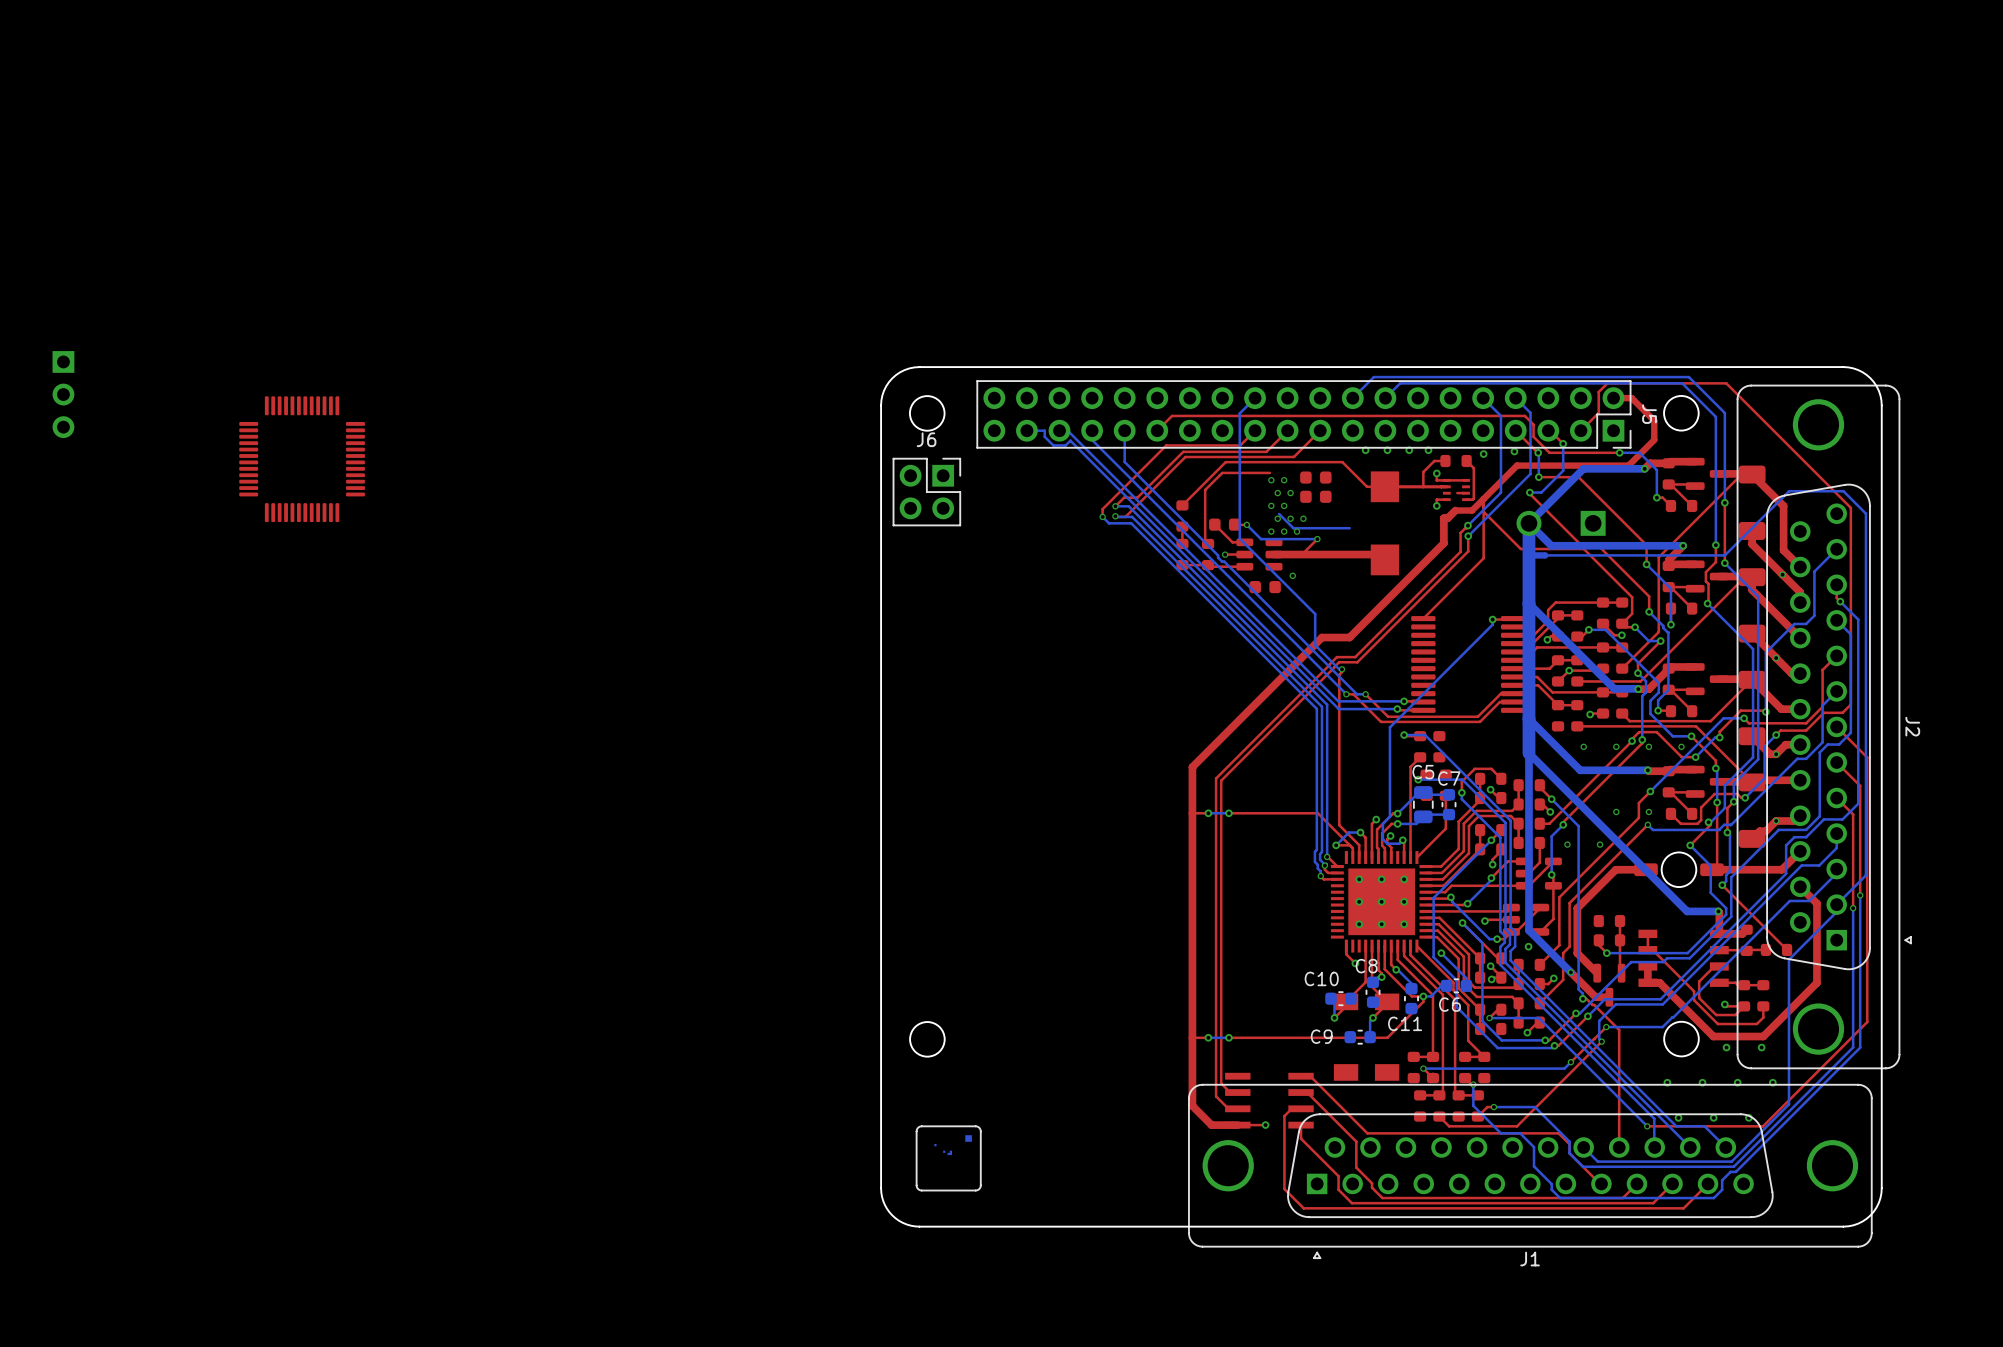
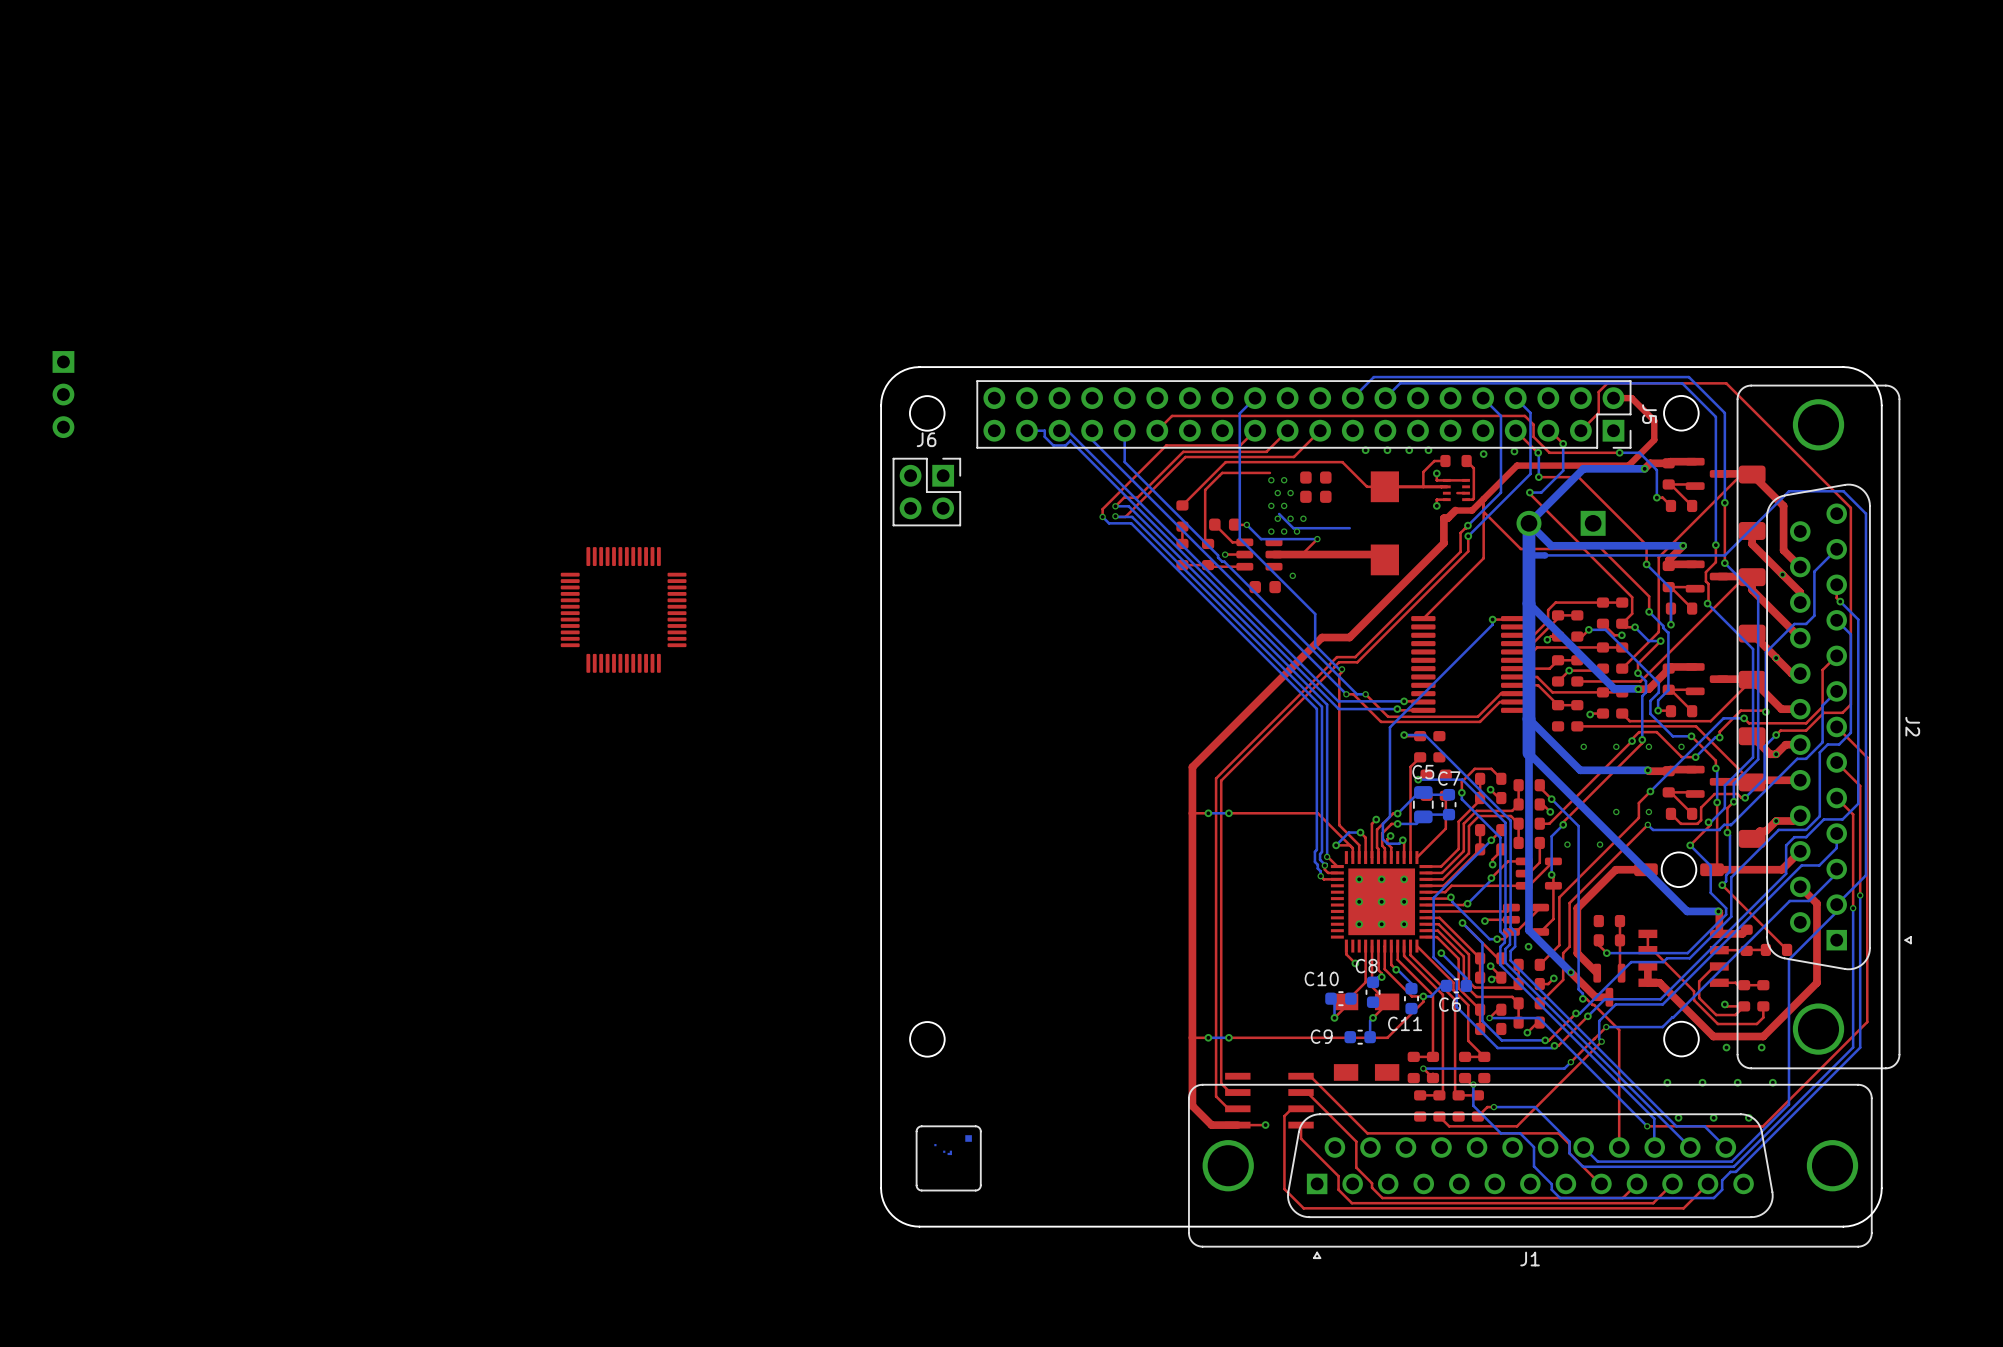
part: (302, 459) -> none
part: none -> (623, 609)

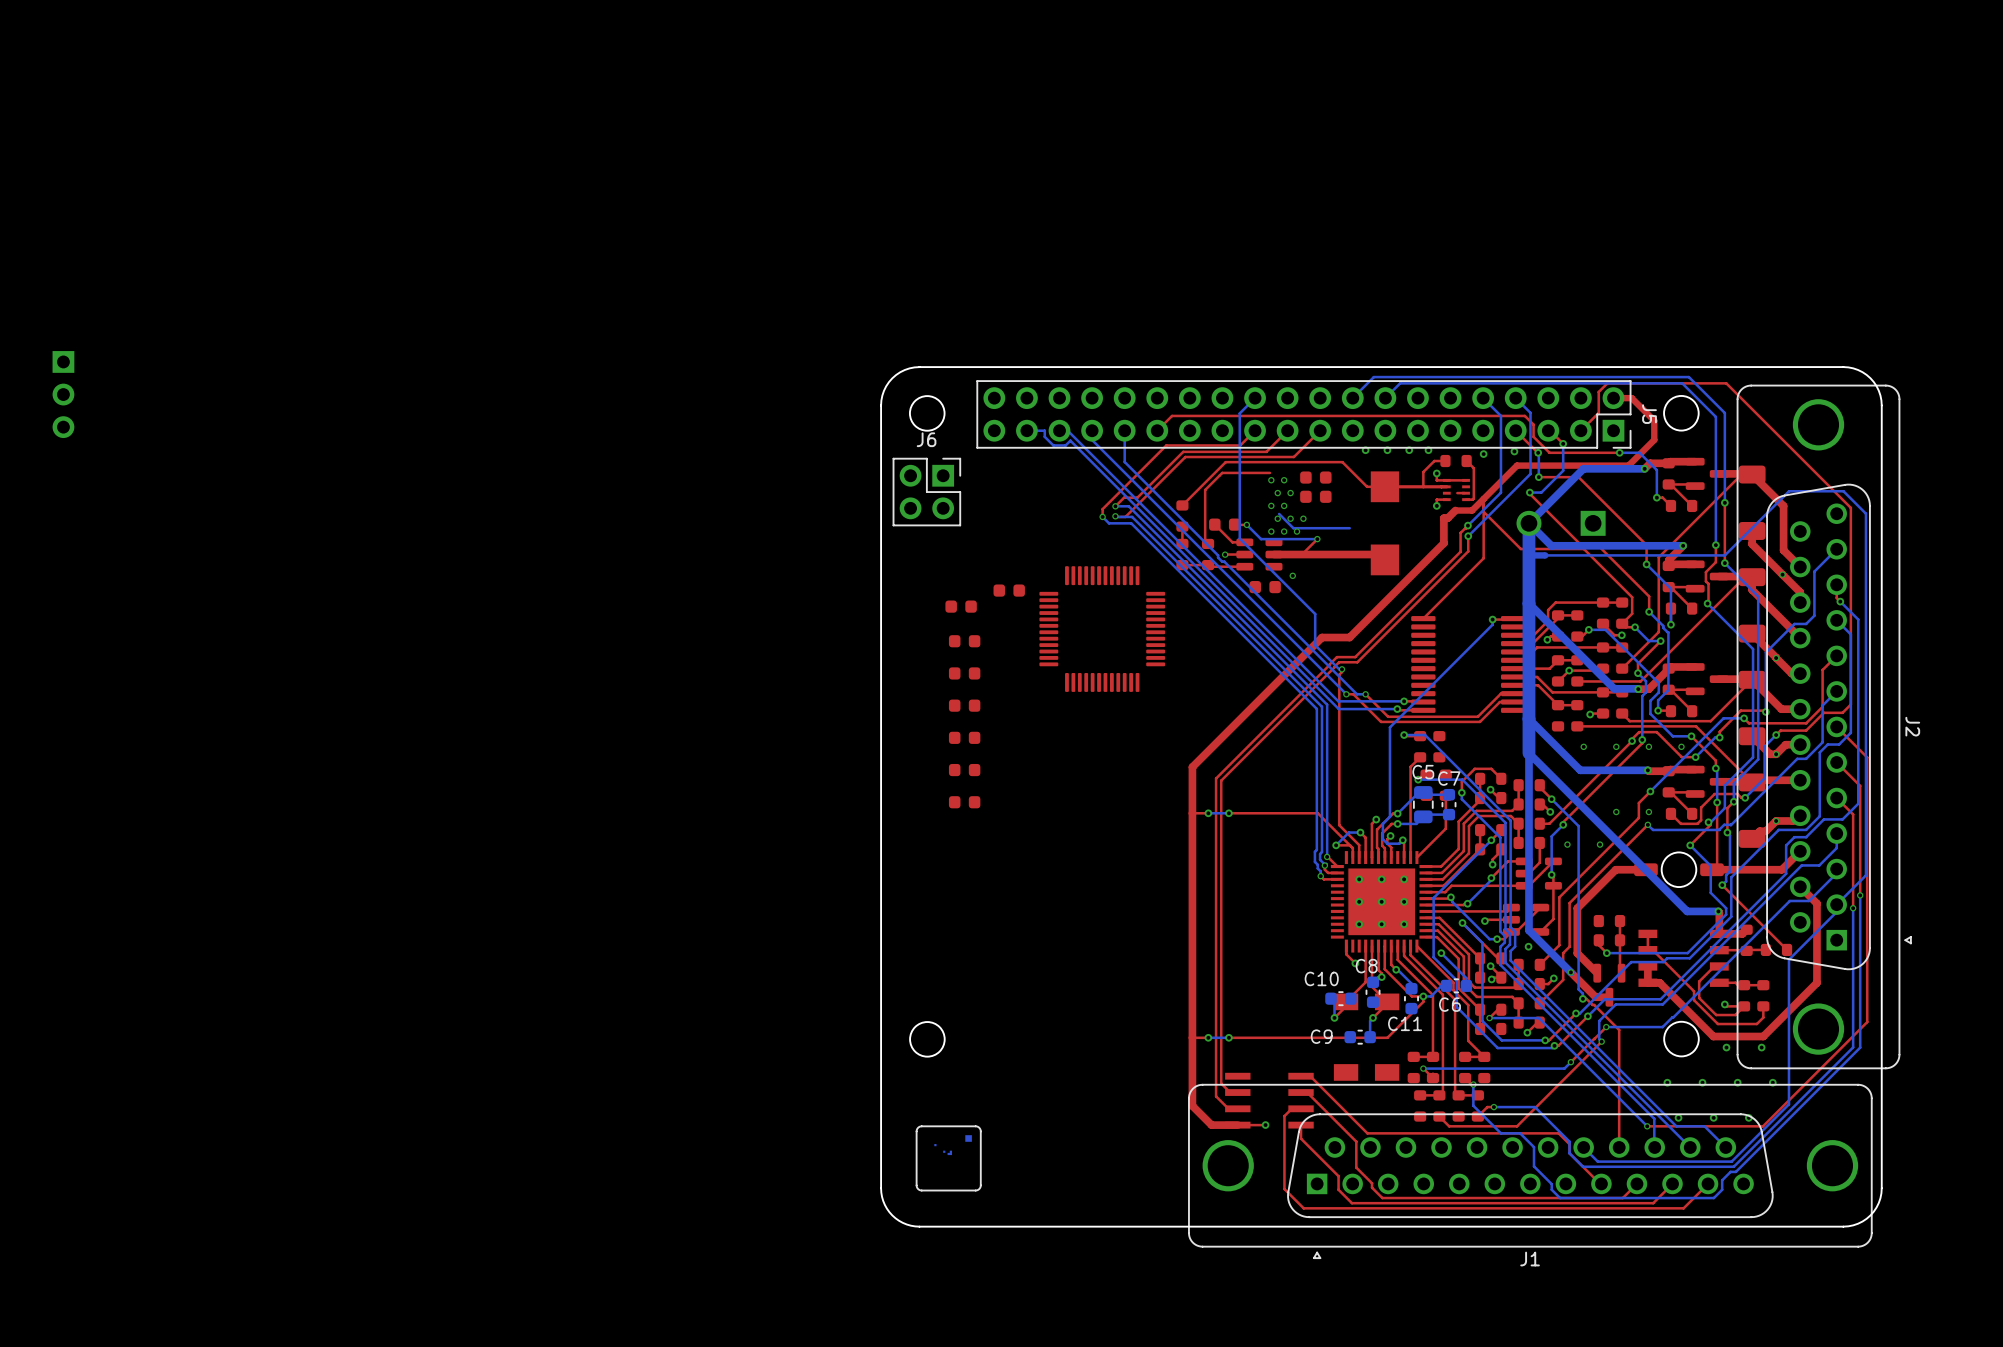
part: none -> (1009, 590)
part: none -> (961, 606)
part: (623, 609) -> none
part: none -> (1102, 629)
part: none -> (964, 641)
part: none -> (964, 673)
part: none -> (964, 705)
part: none -> (964, 737)
part: none -> (964, 770)
part: none -> (964, 802)

